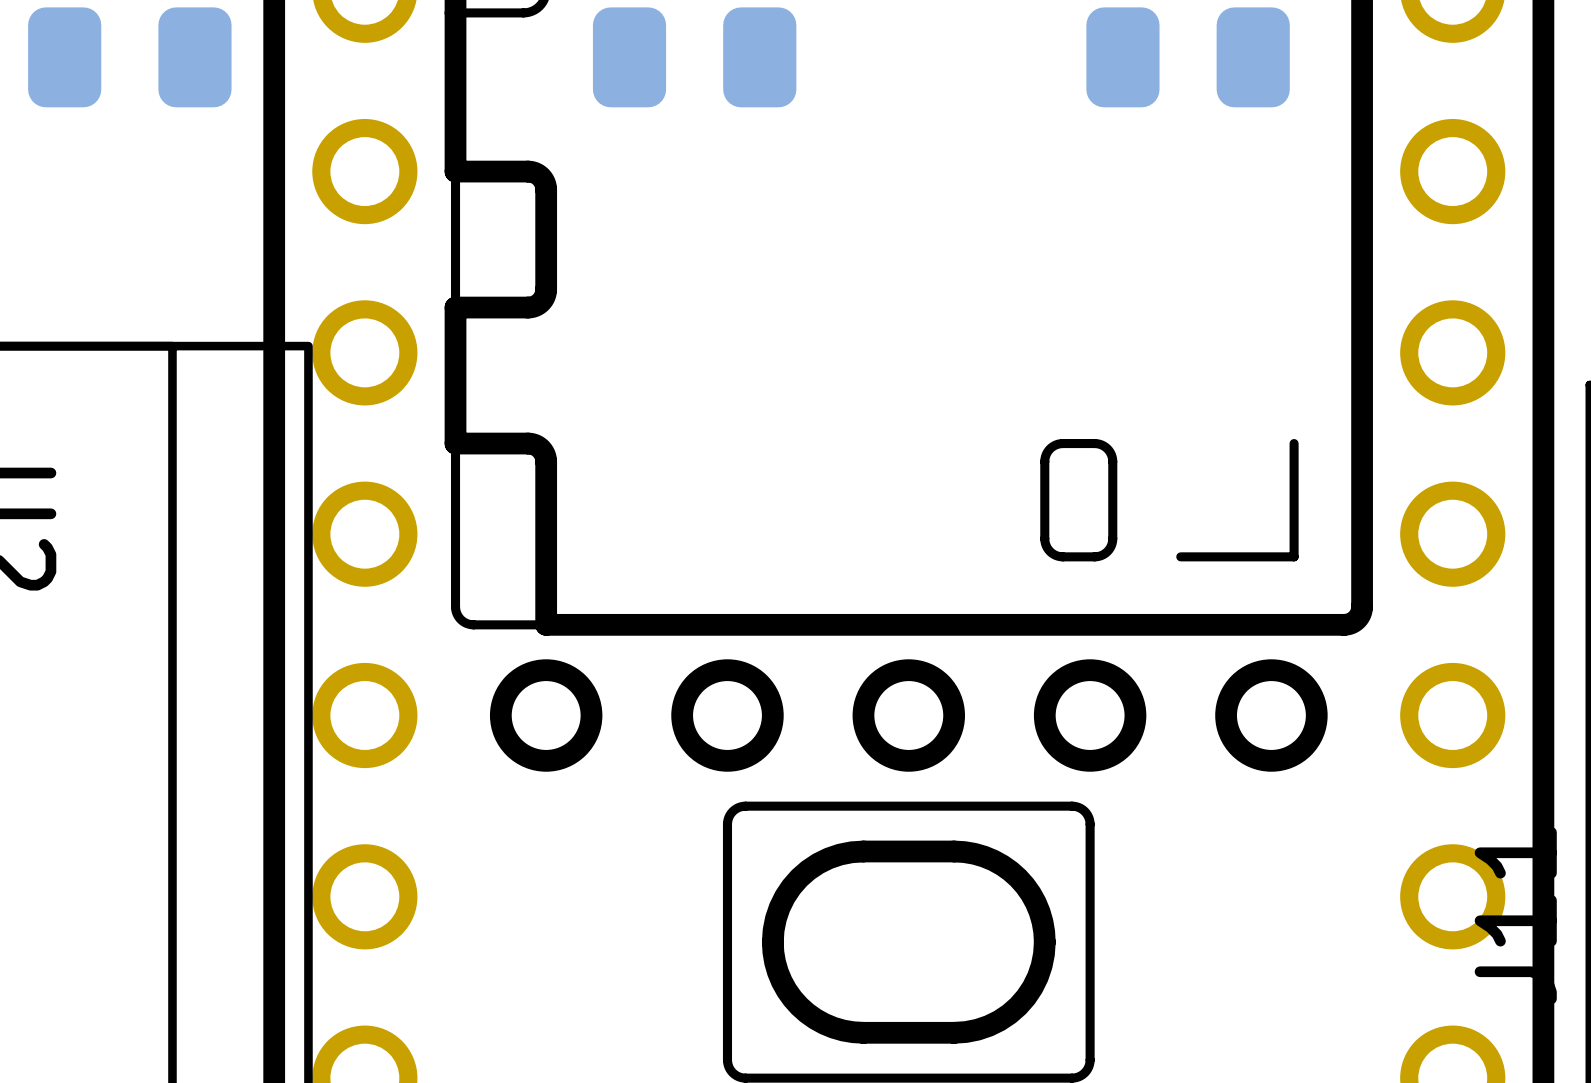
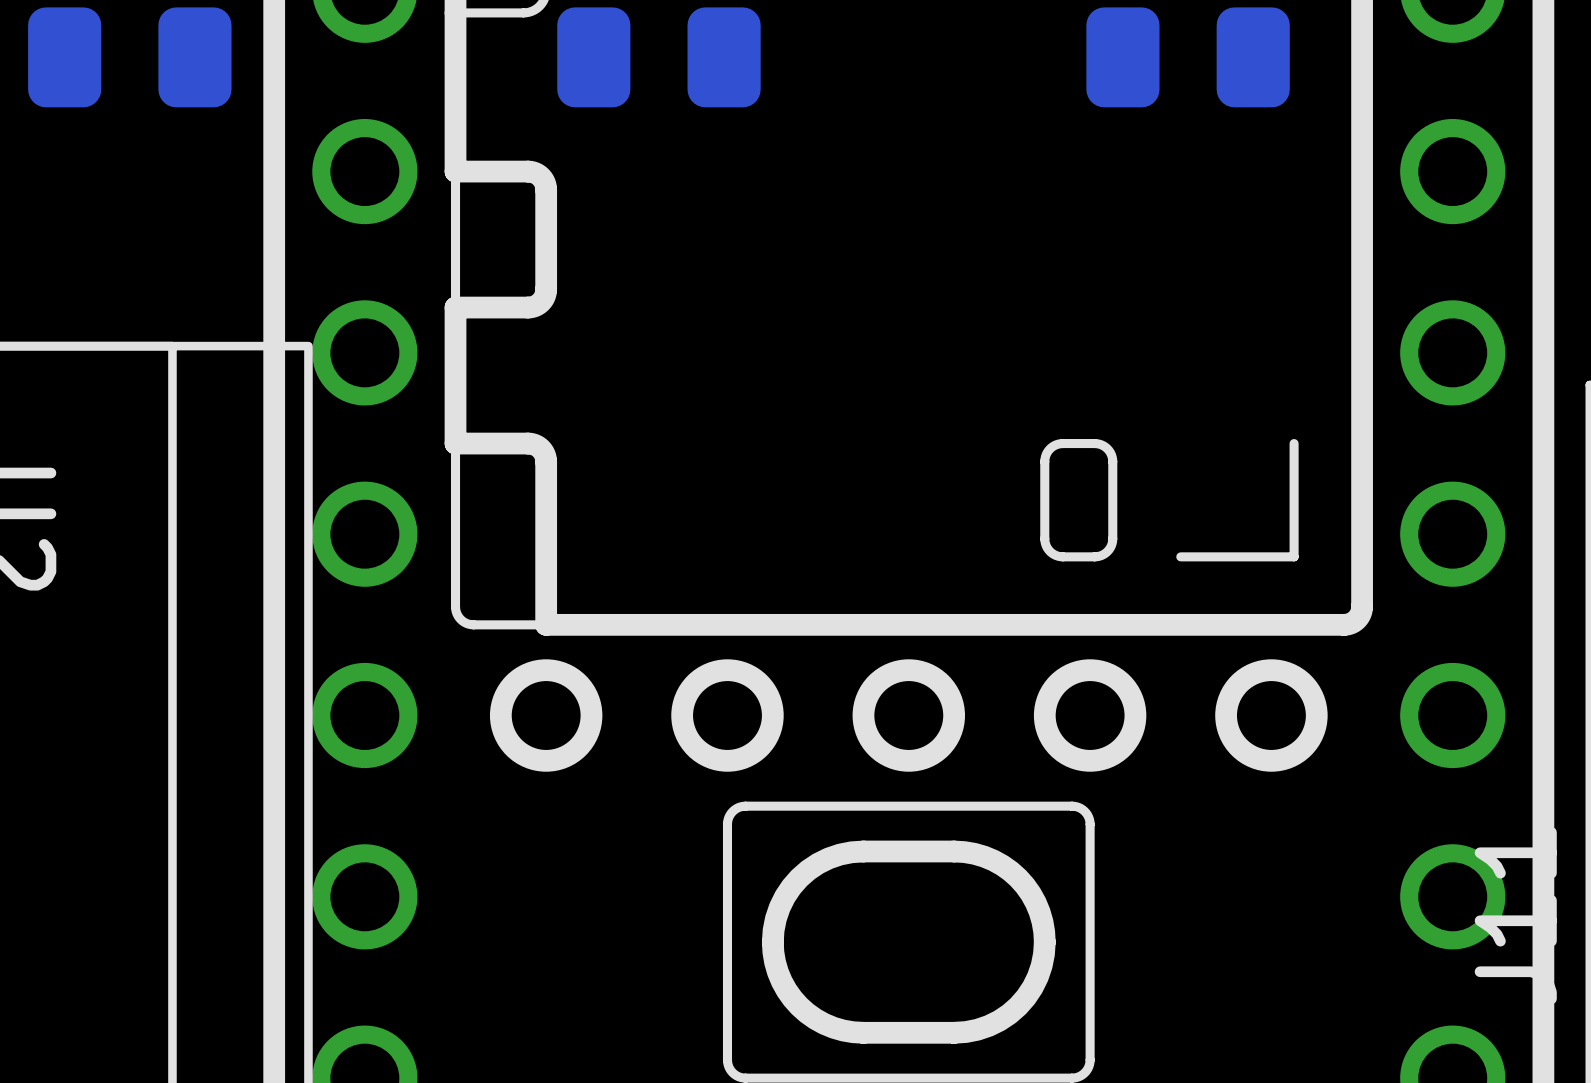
part position: (694, 57) -> (658, 57)

